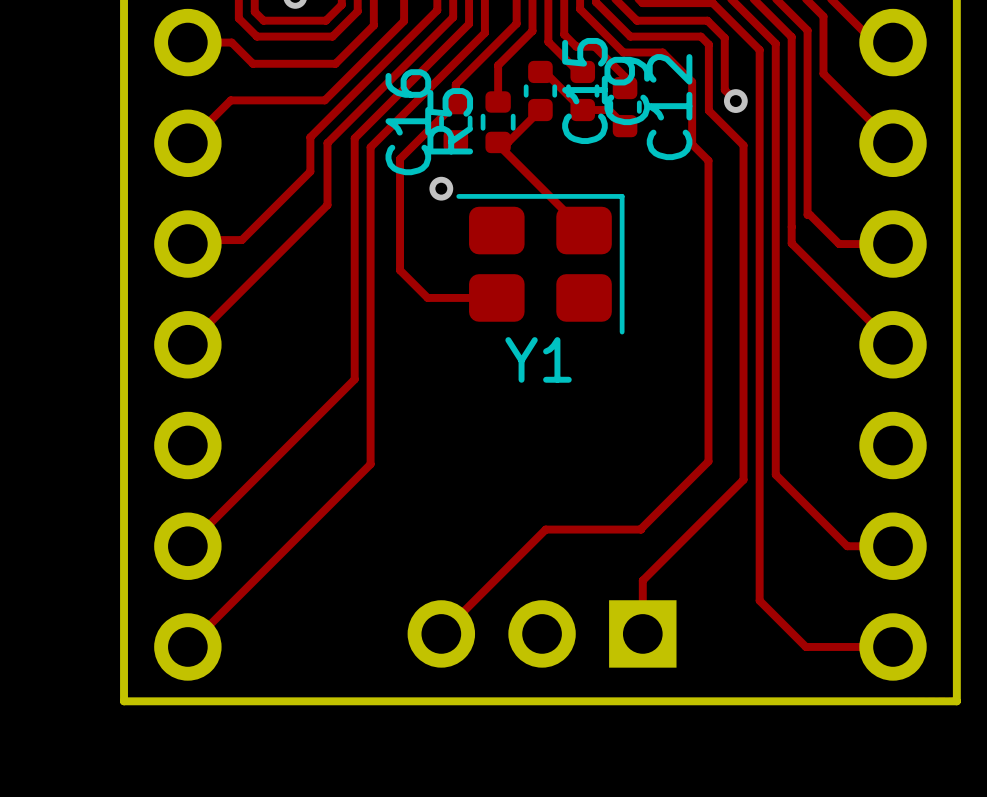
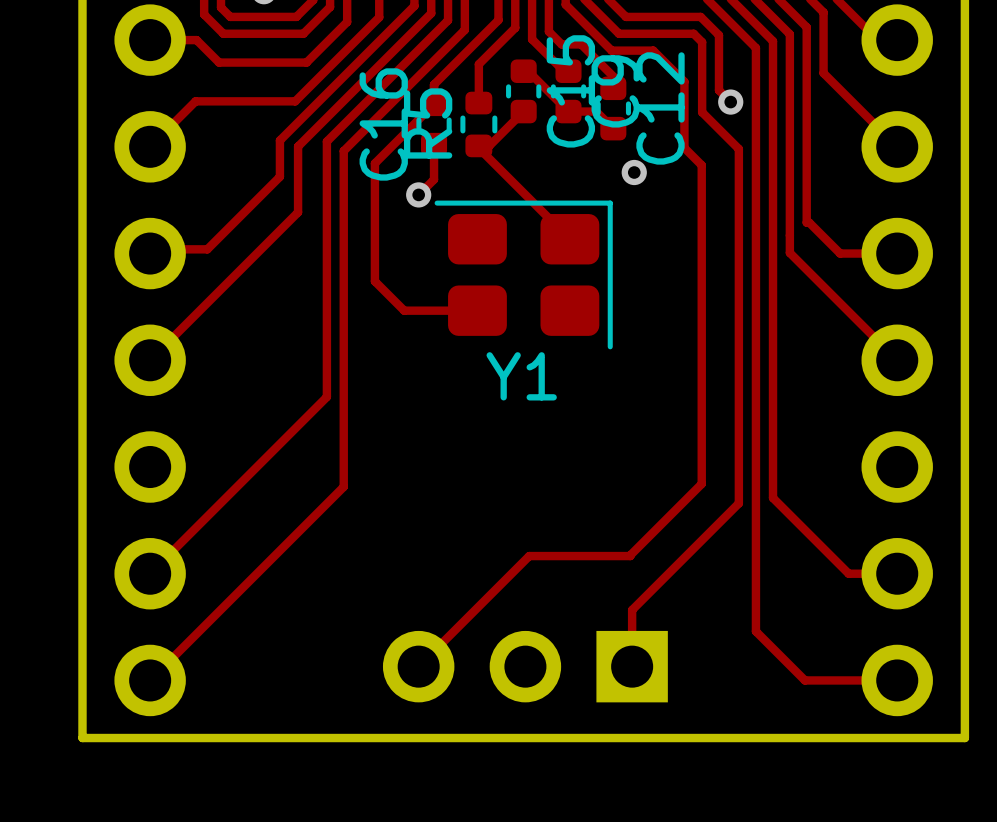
track: none -> (434, 144) (434, 179) (418, 194)
via: none -> (634, 172)

